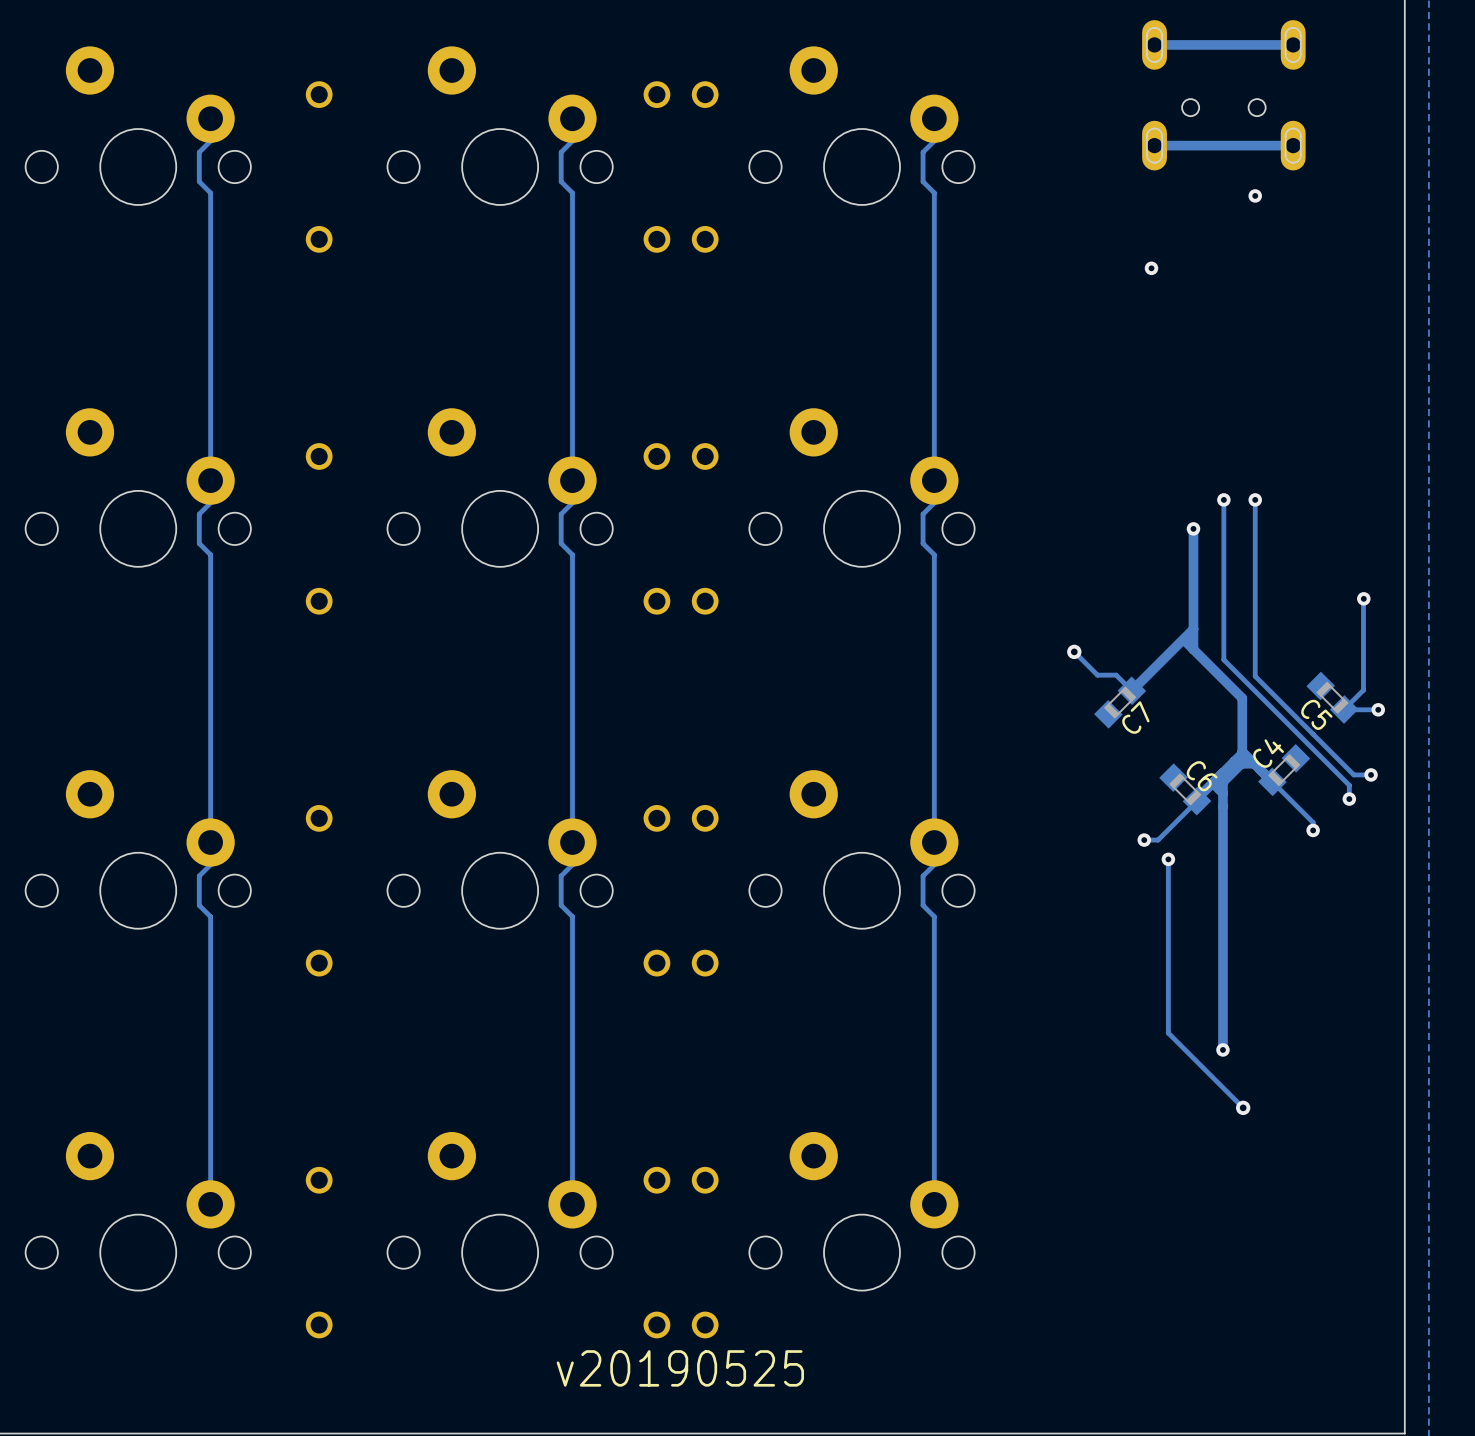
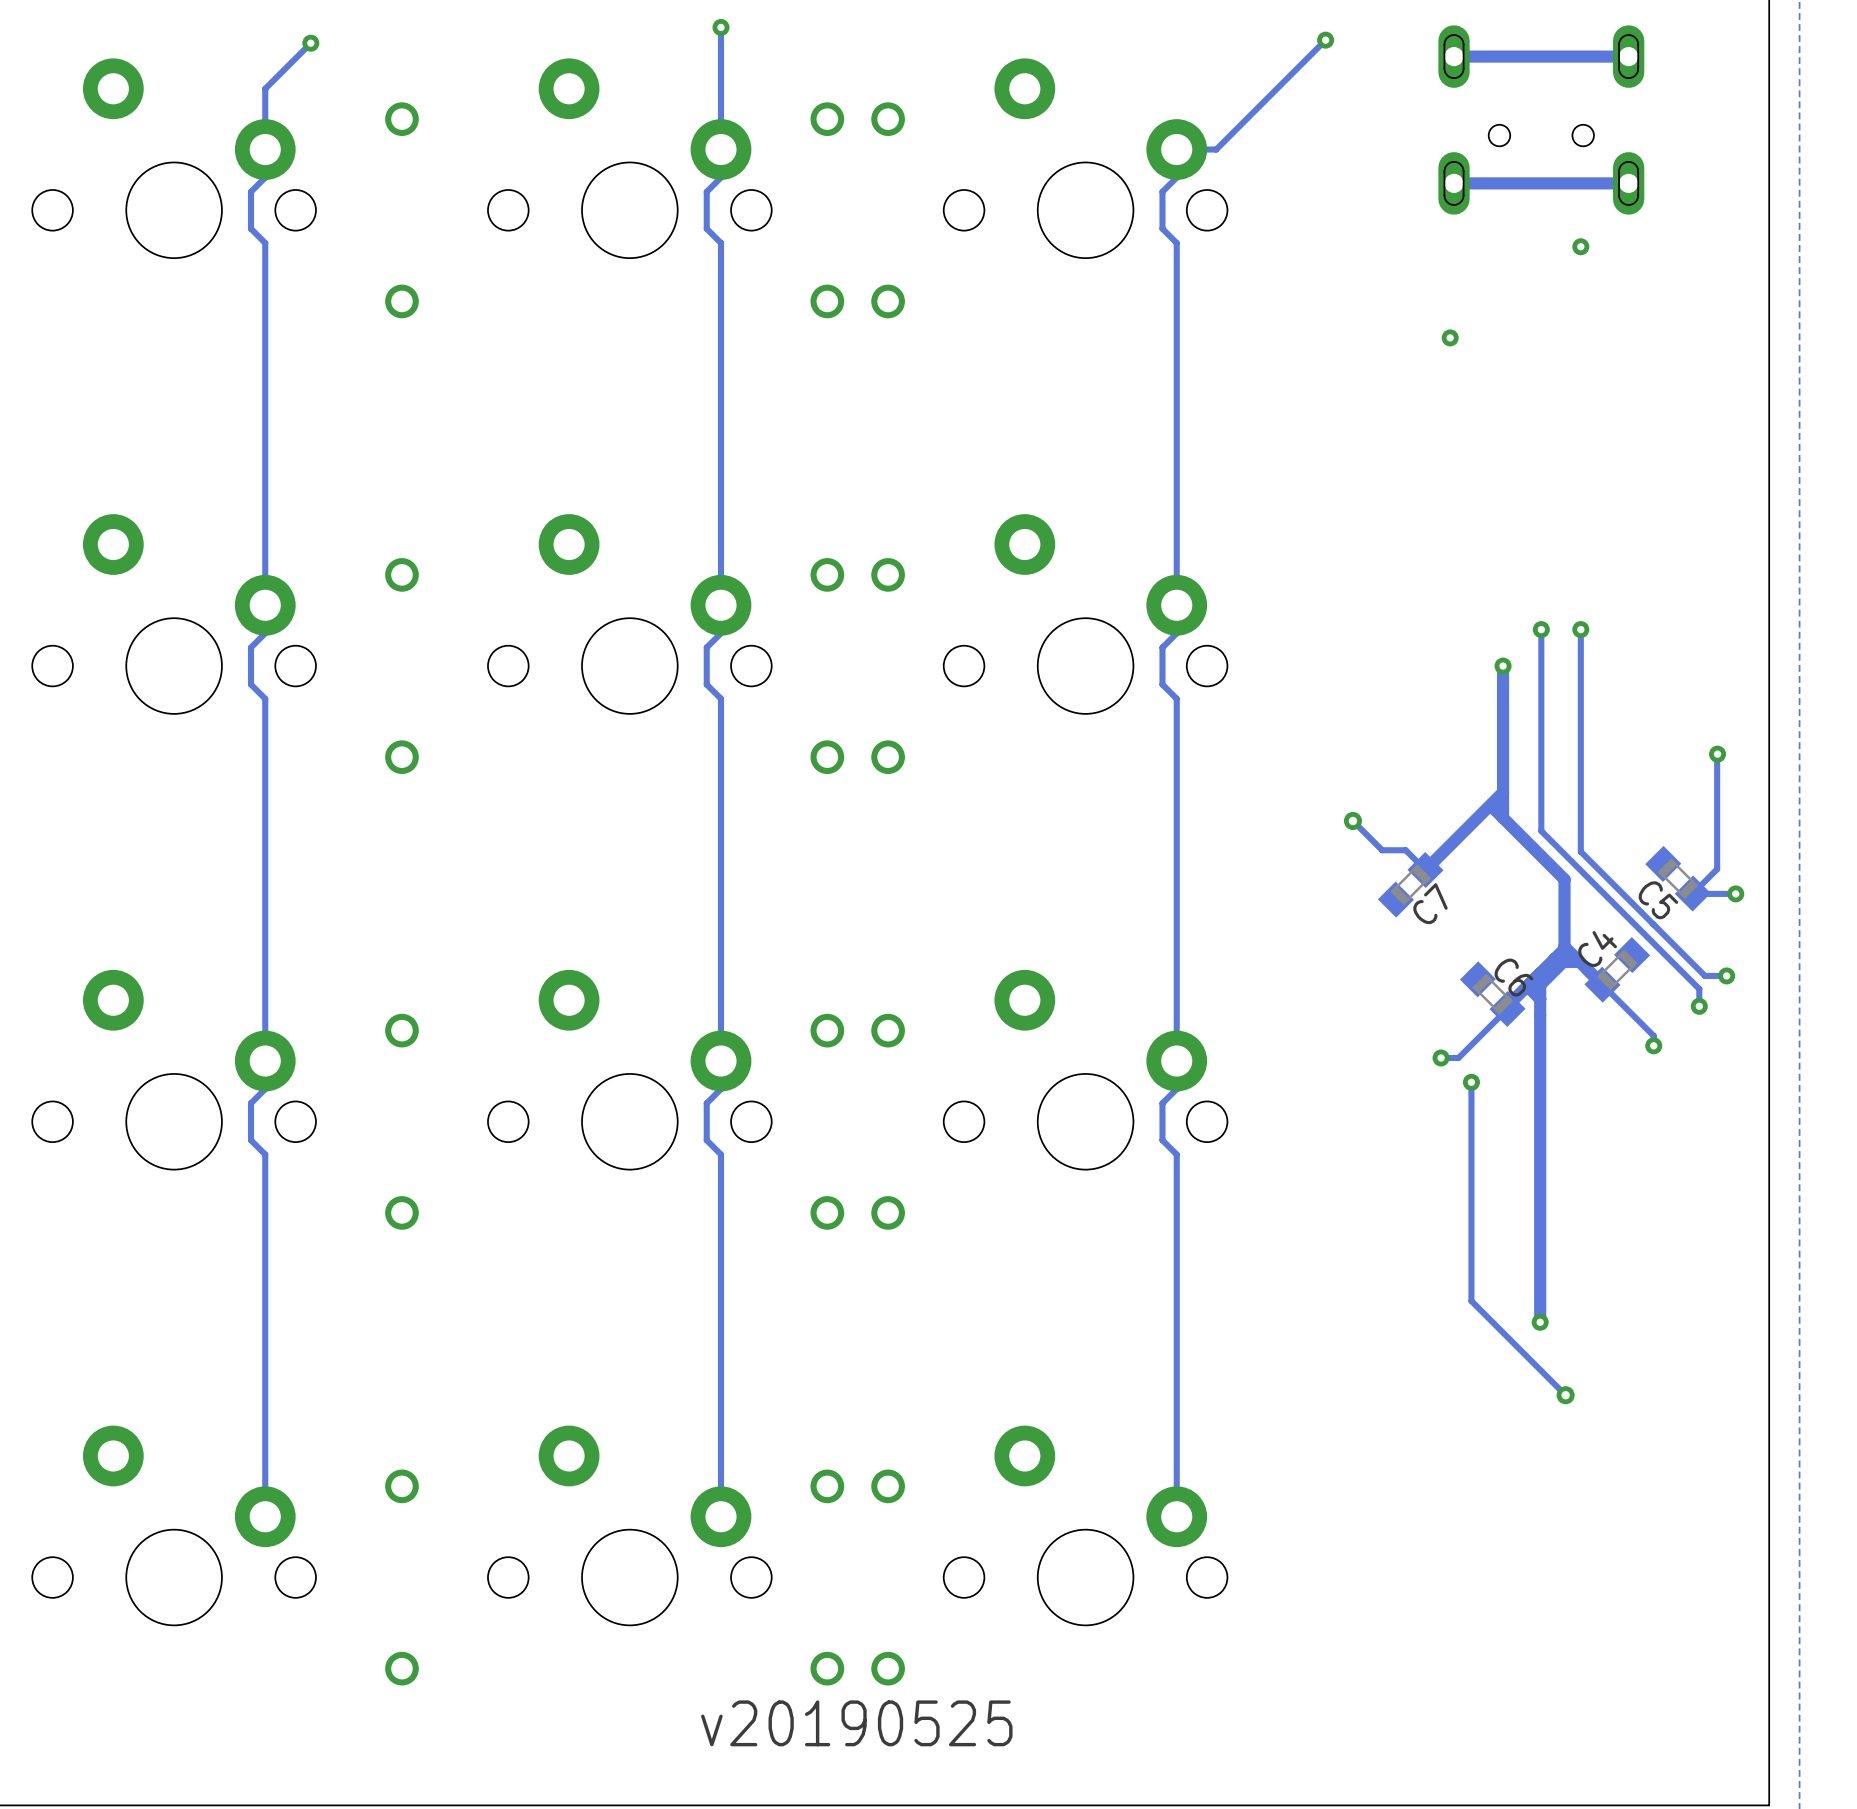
track: none -> (720, 27) (720, 149)
via: none -> (720, 27)
track: none -> (1325, 40) (1216, 149) (1176, 149)
via: none -> (1325, 40)
track: none -> (310, 43) (265, 88) (265, 149)
via: none -> (310, 43)

